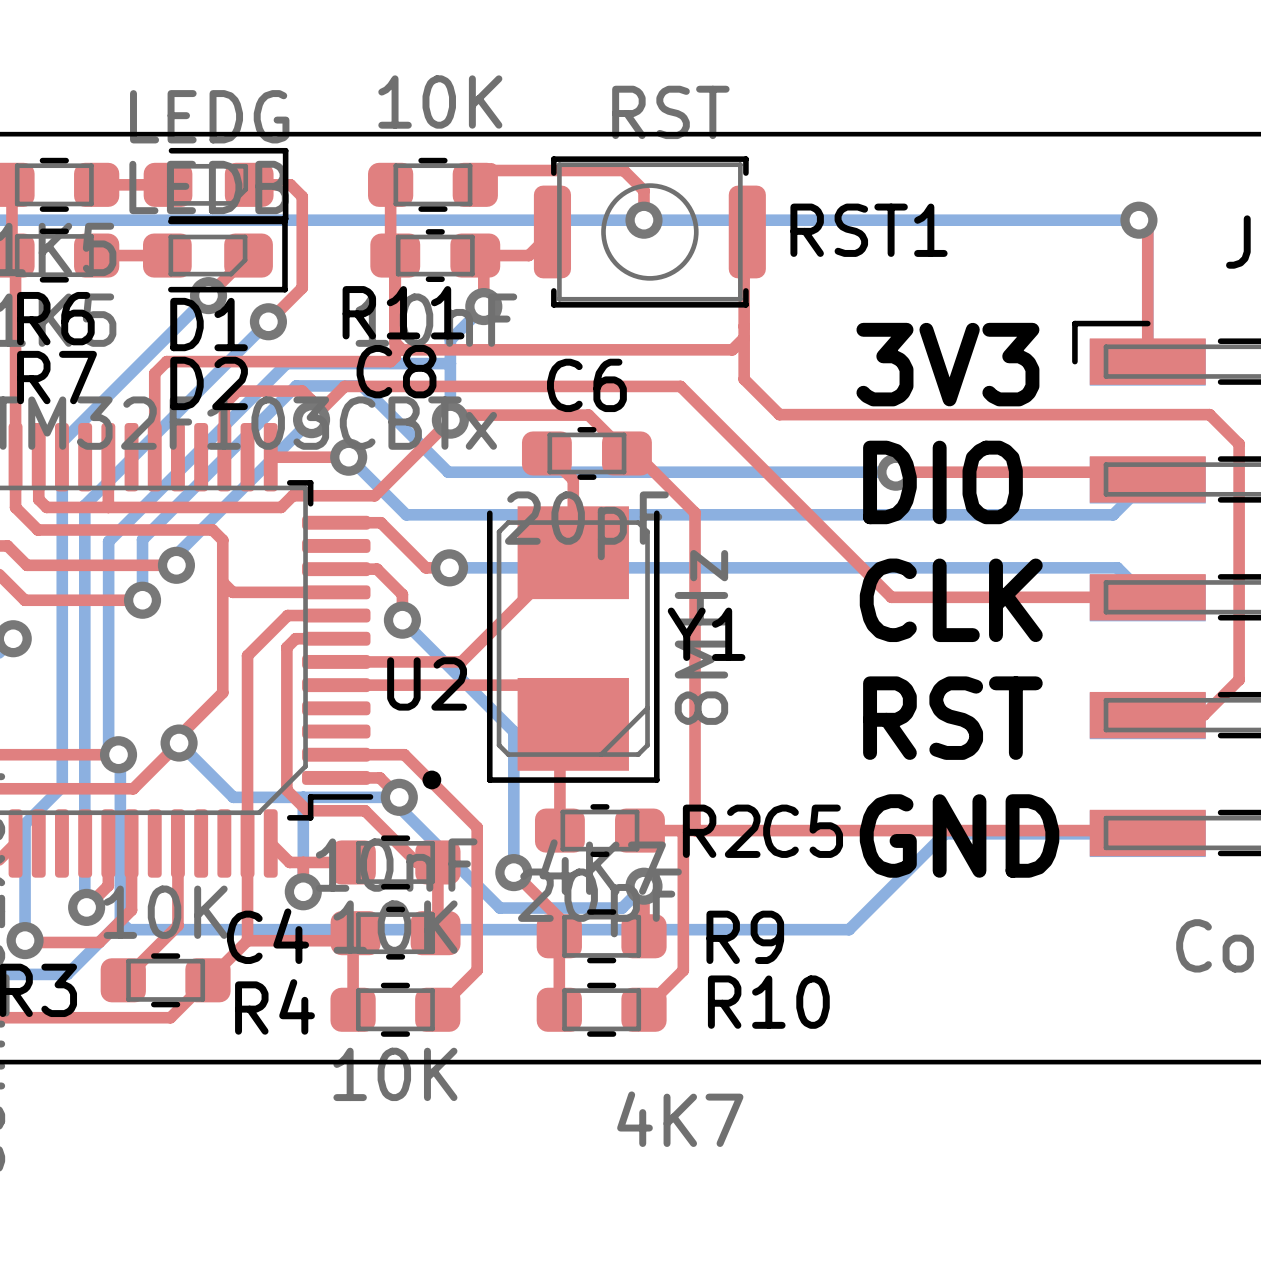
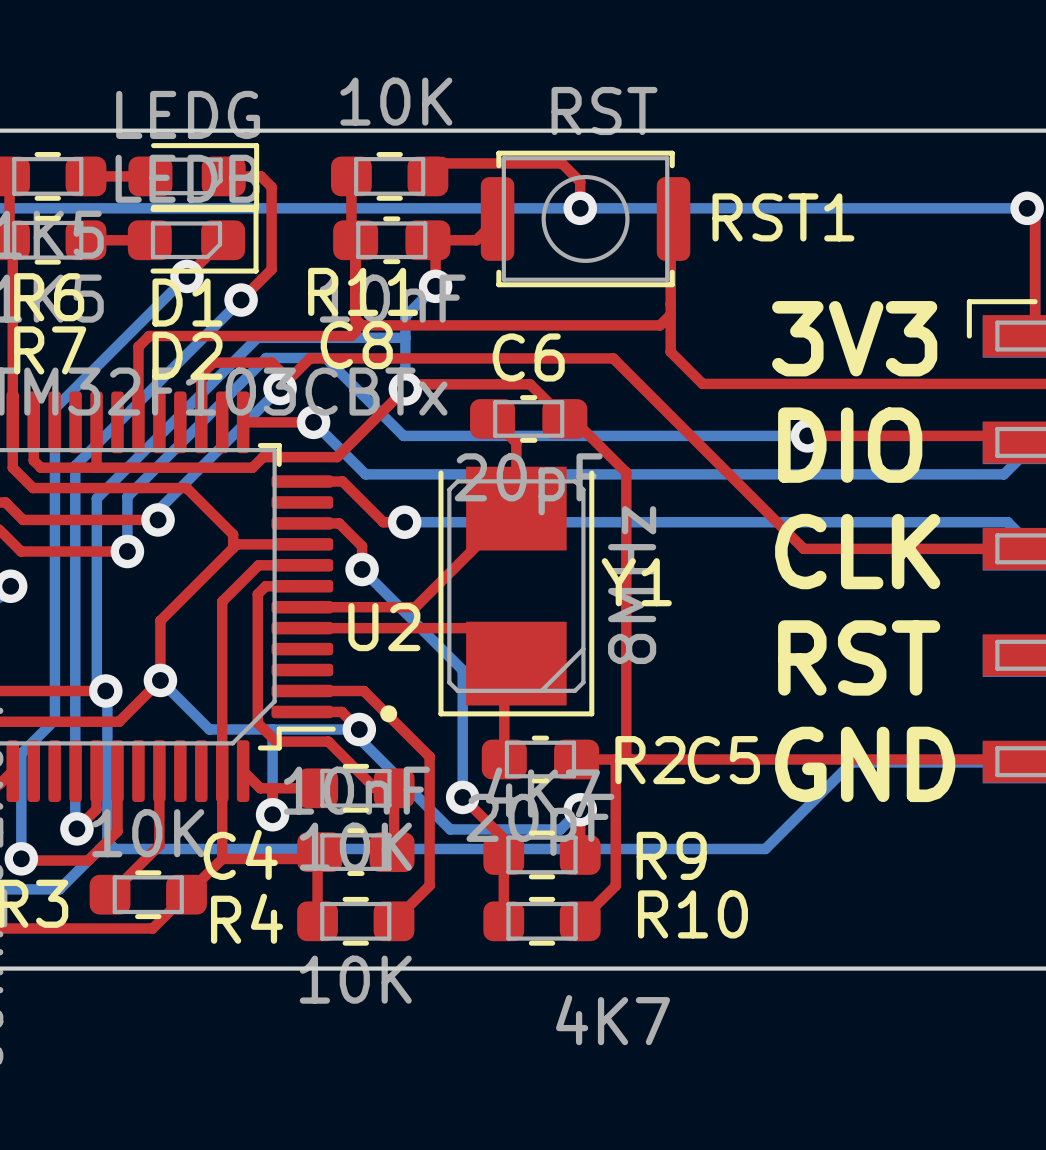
top track: (208, 529) (212, 529) (222, 540) (222, 692) (179, 736) -> (236, 544) (160, 620) (160, 674)
top track: none -> (186, 488) (233, 534) (233, 548)
top track: (222, 582) (232, 592) (263, 592) -> none

